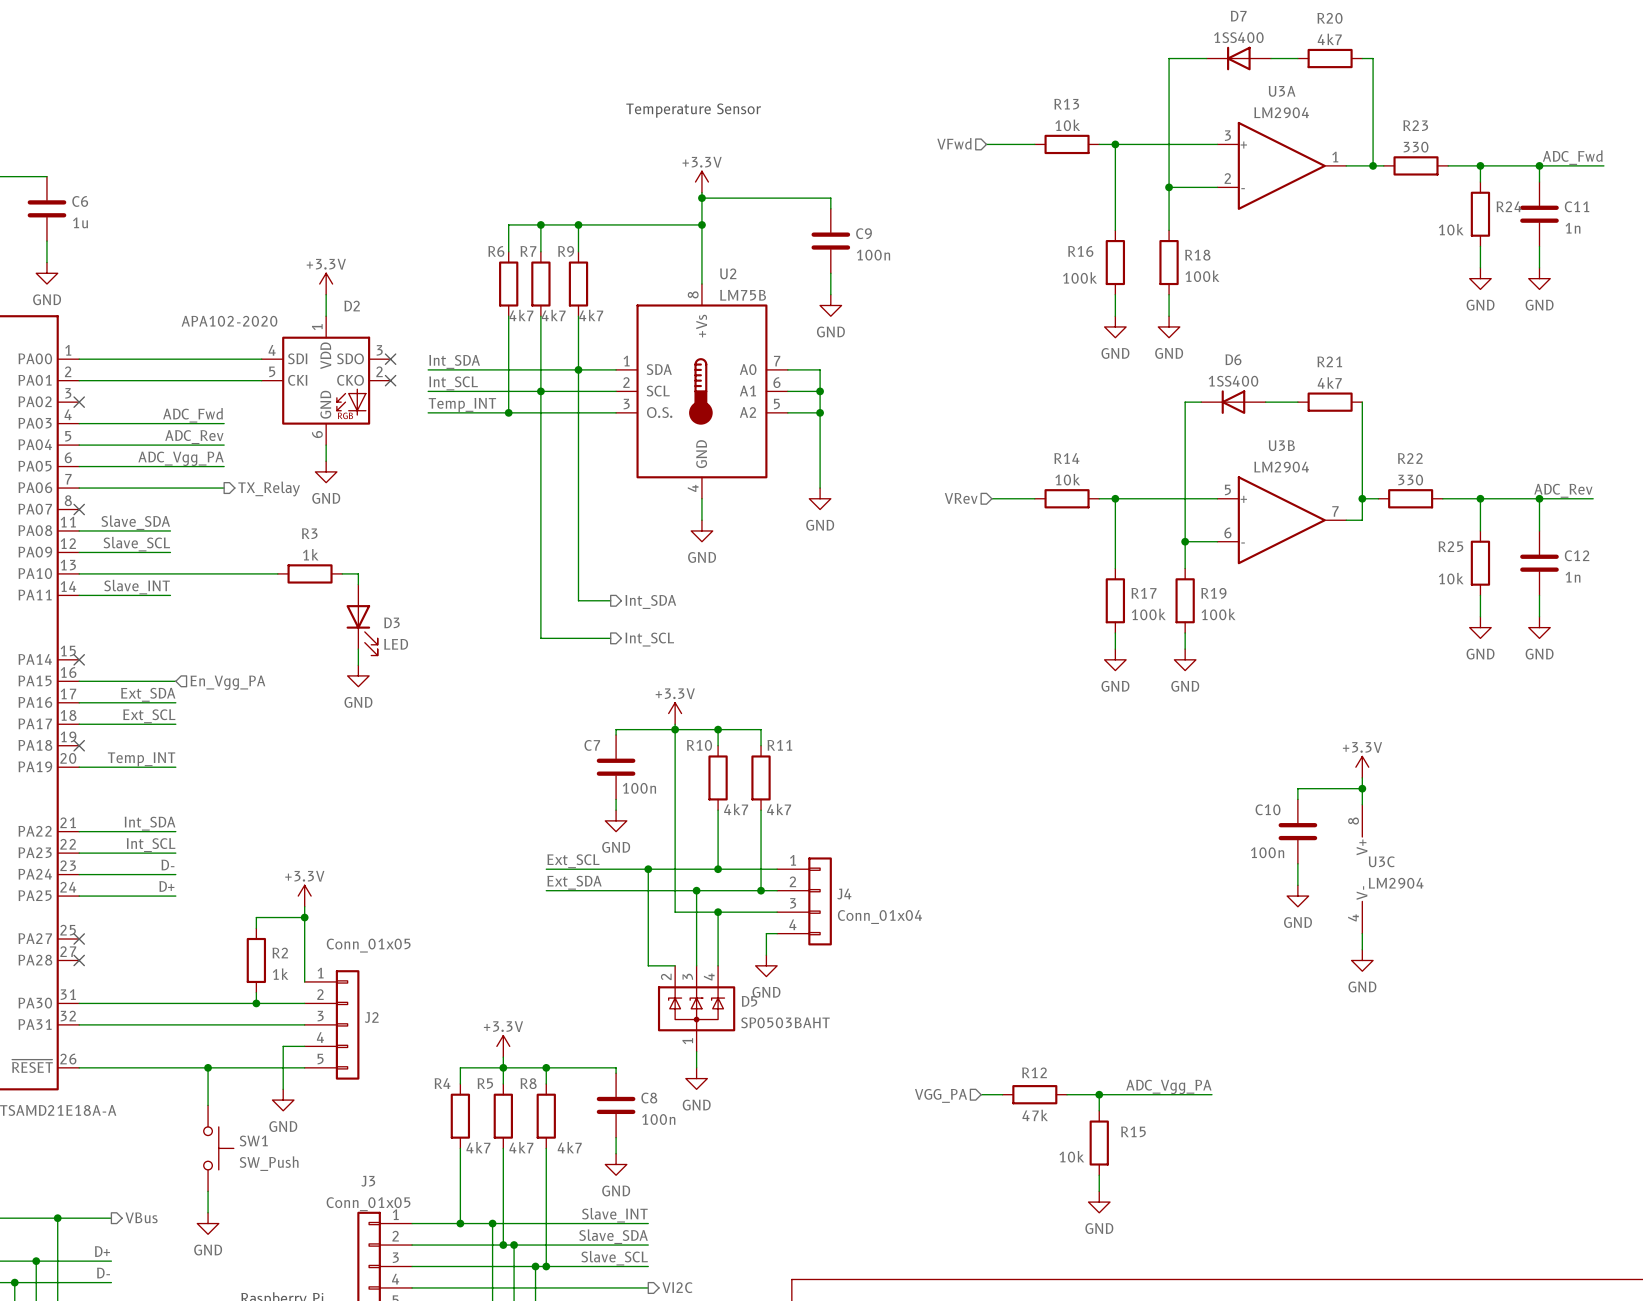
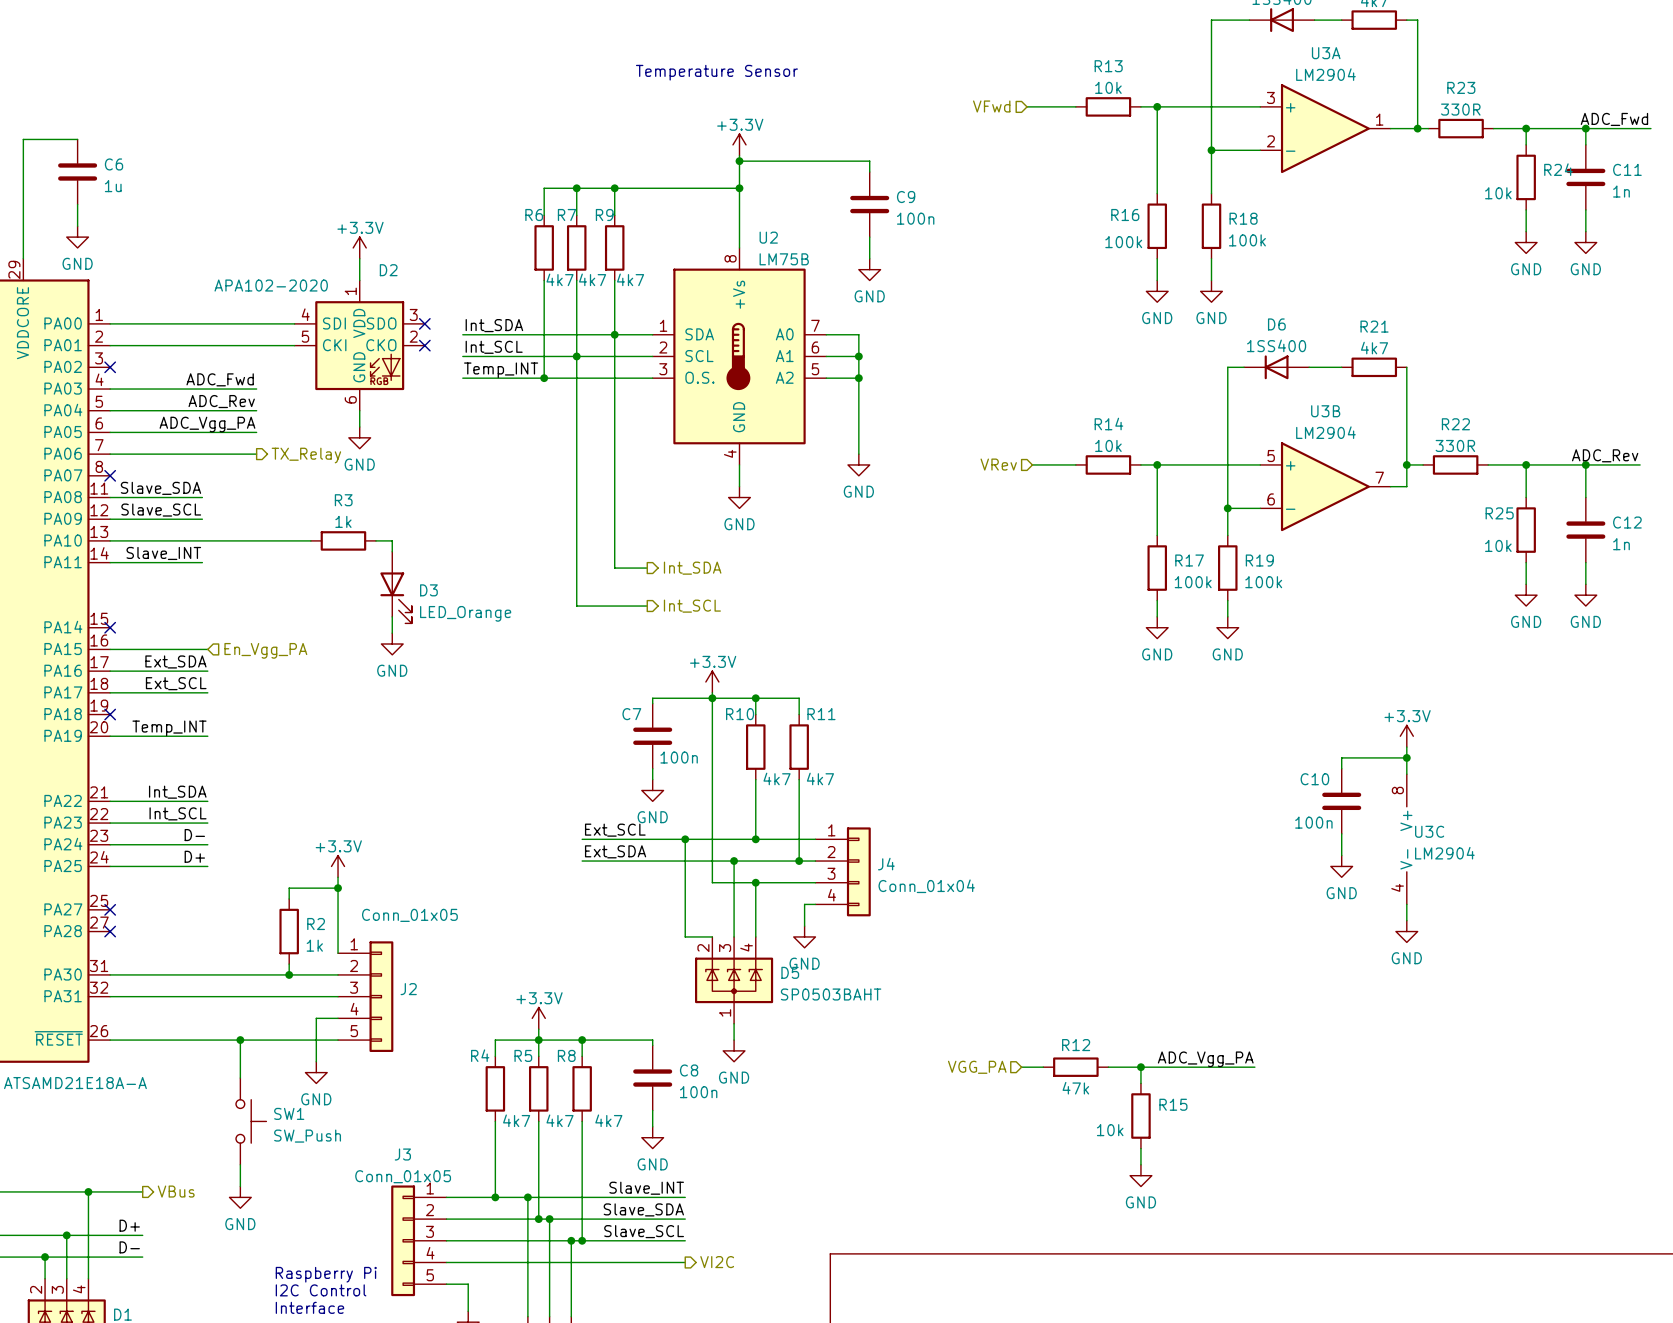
R23 value: 330 (1416, 147) -> 330R (1460, 109)
R22 value: 330 (1410, 480) -> 330R (1455, 445)
D3 value: LED (396, 644) -> LED_Orange (465, 613)

